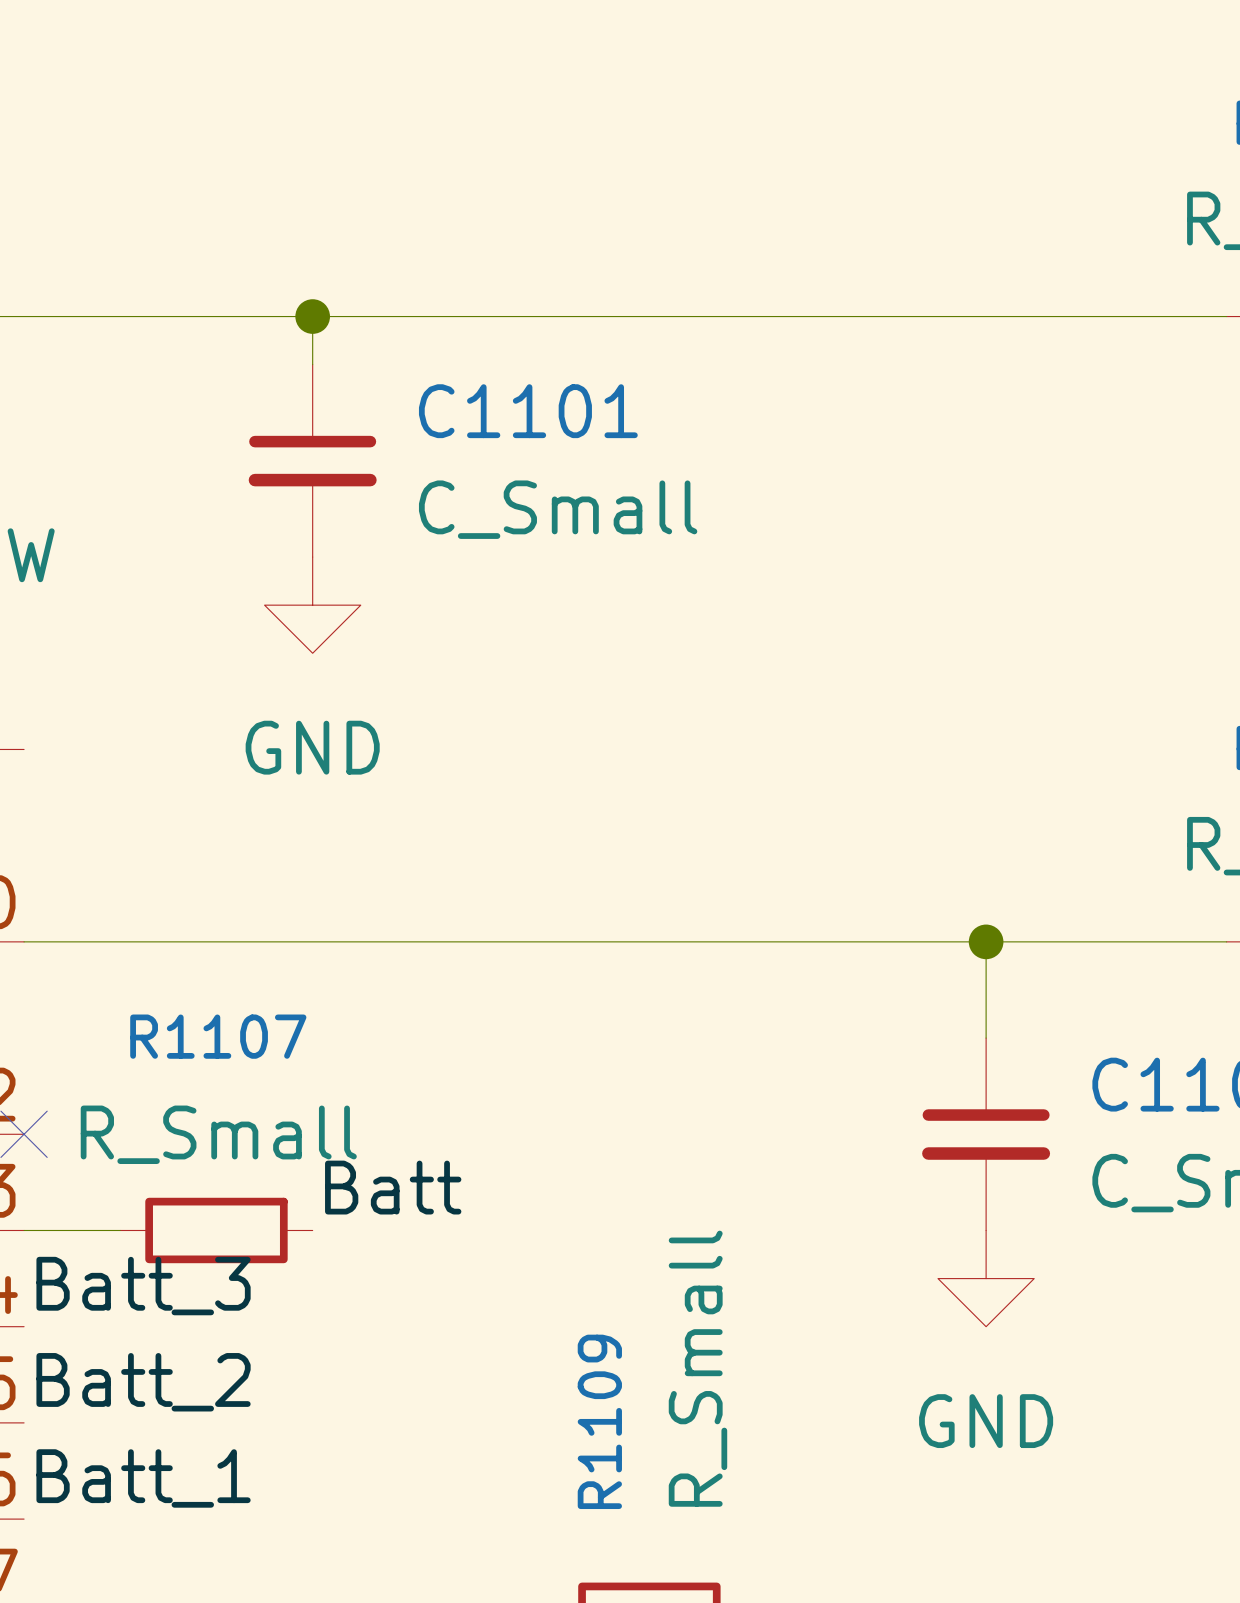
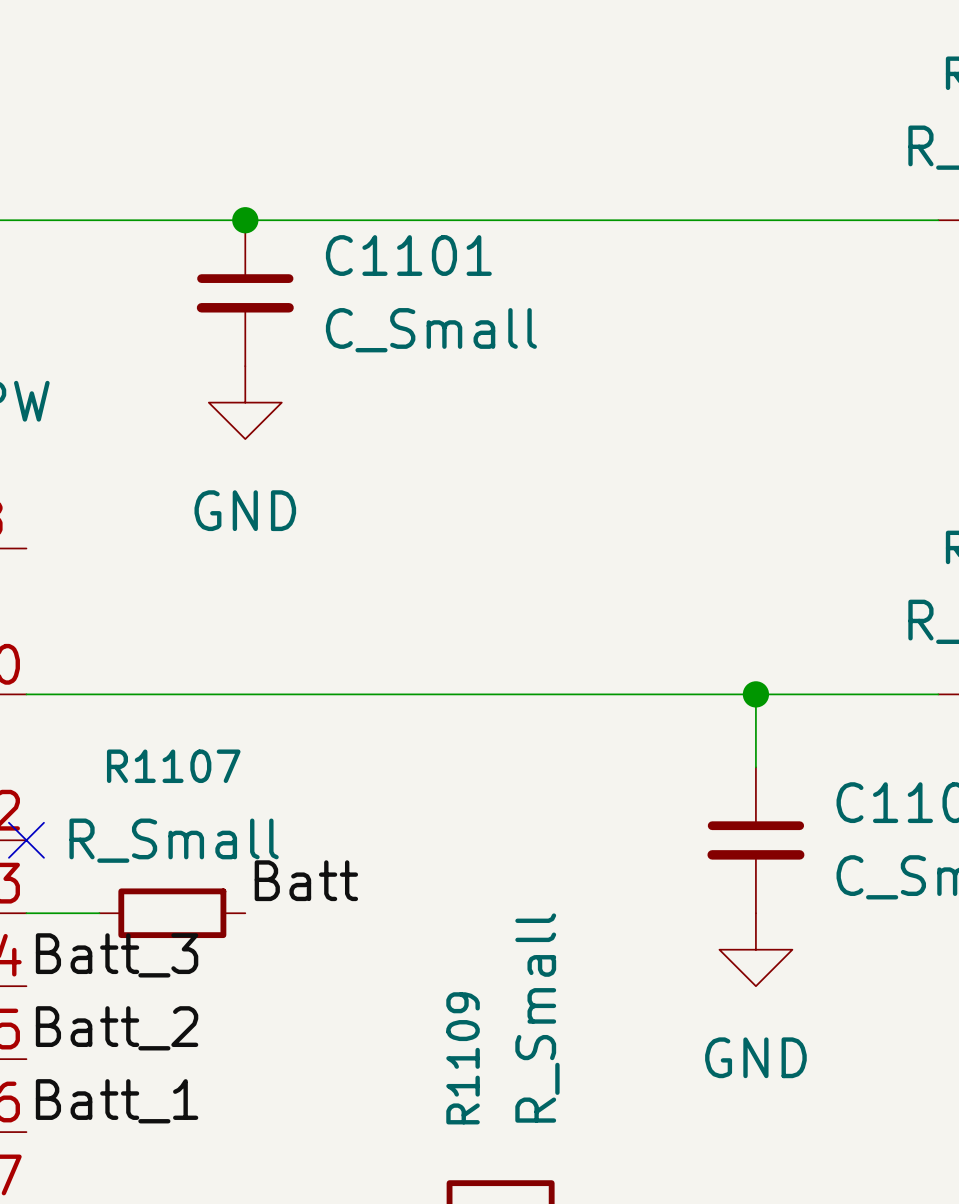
C1101 position: (312, 460) -> (245, 293)
power symbol position: GND (312, 605) -> GND (245, 402)

